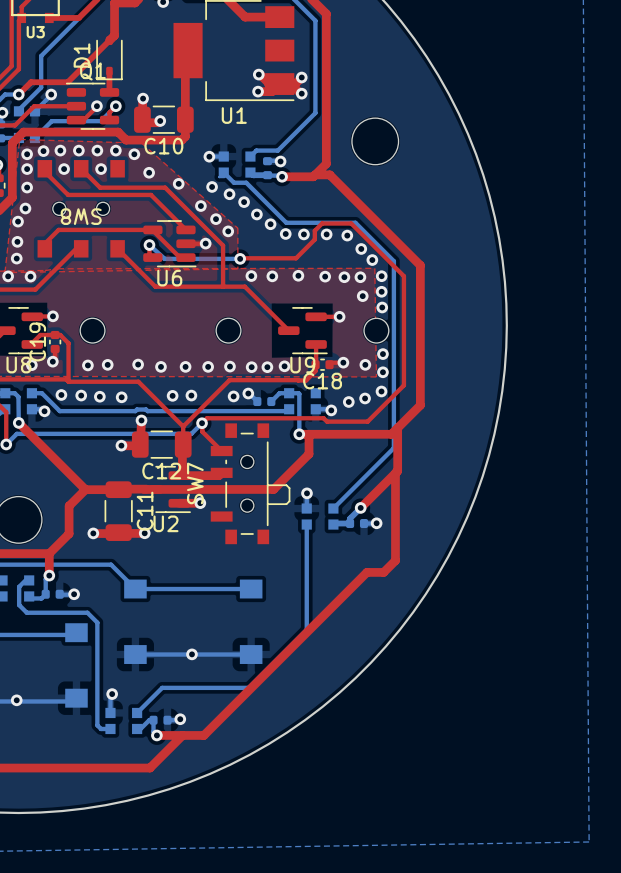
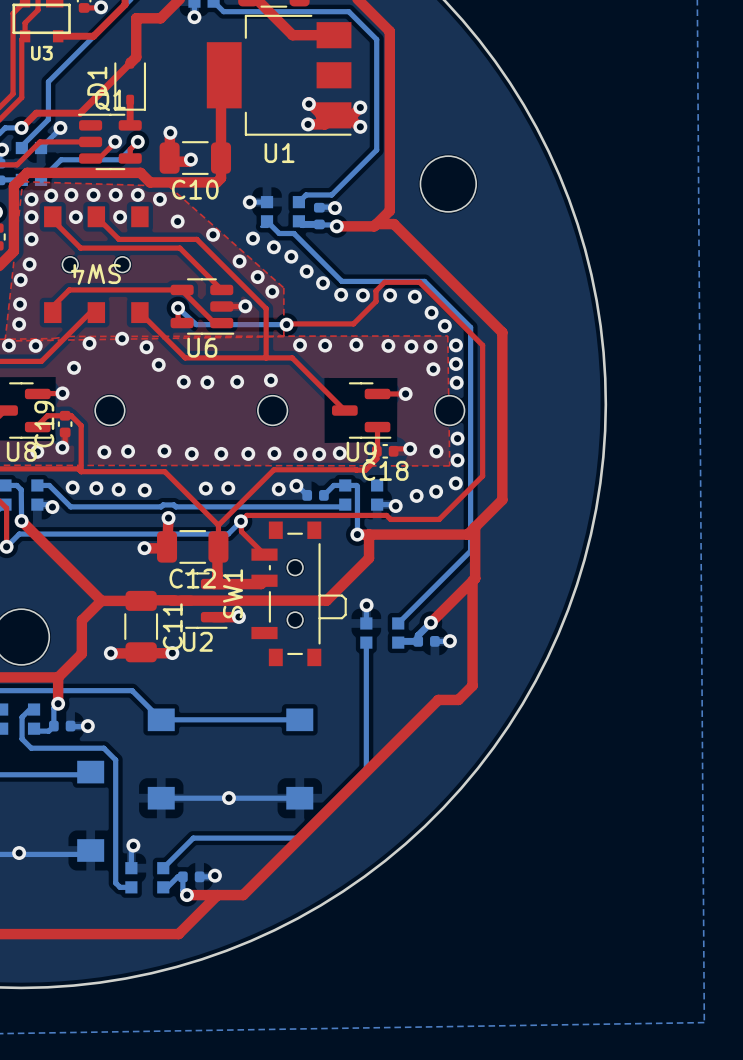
SW8 name: SW8 (81, 216) -> SW4 (95, 274)
via: none -> (122, 338)
via: none -> (89, 343)
via: none -> (146, 347)
via: none -> (158, 364)
via: none -> (74, 367)
via: none -> (270, 380)
via: none -> (183, 381)
via: none -> (237, 381)
via: none -> (207, 382)
SW7 name: SW7 (195, 483) -> SW1 (233, 593)

